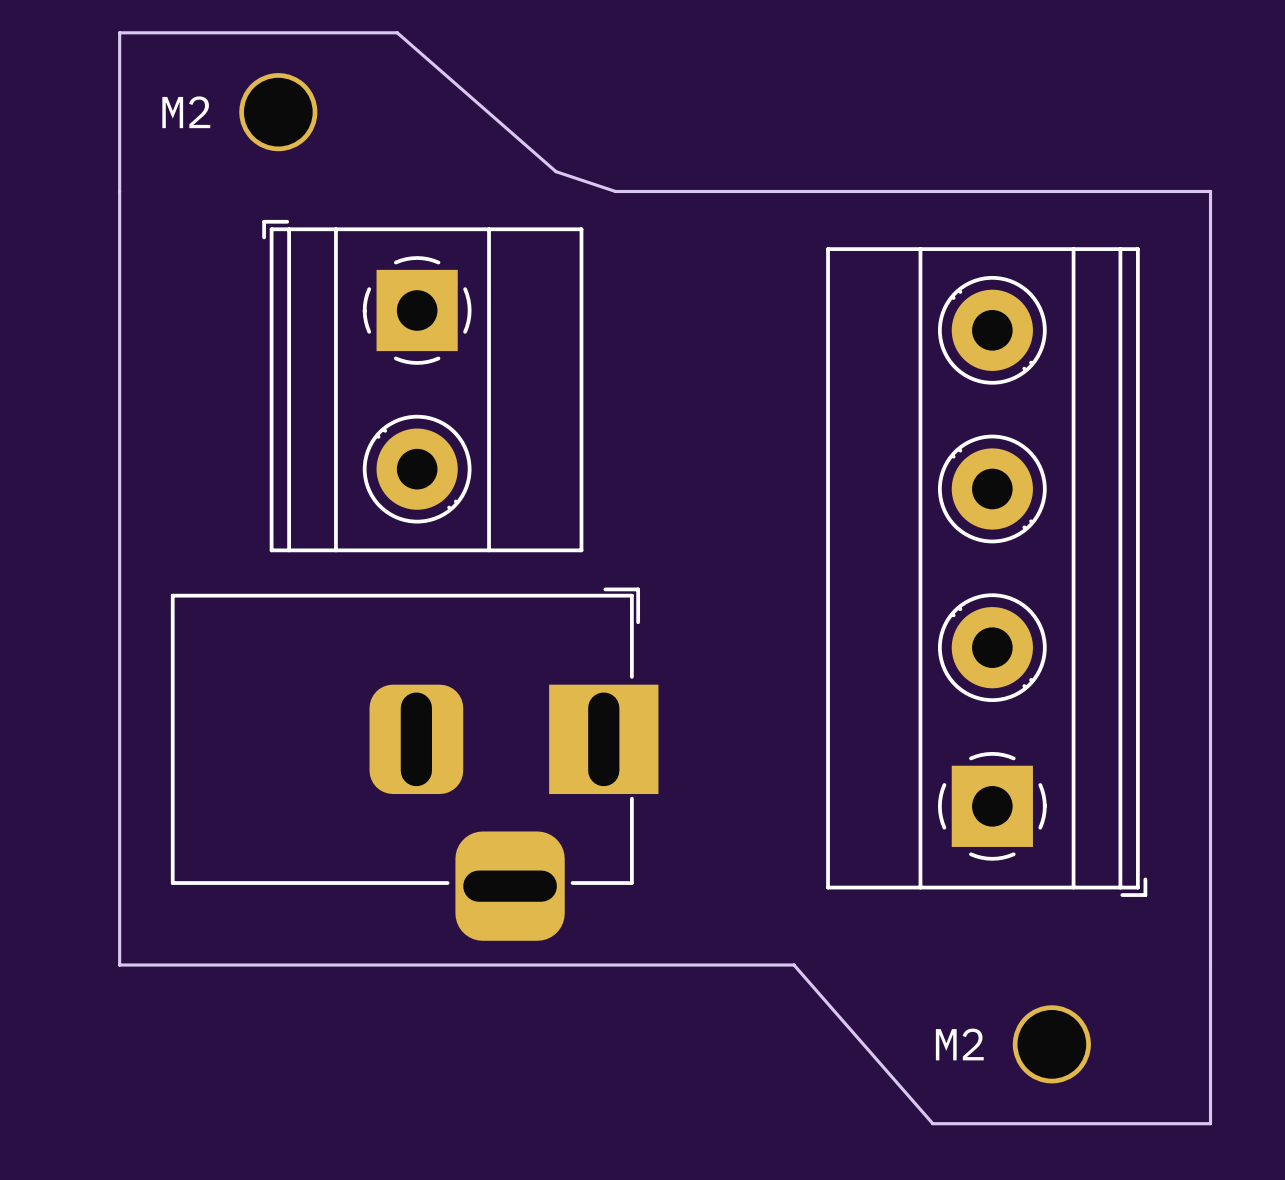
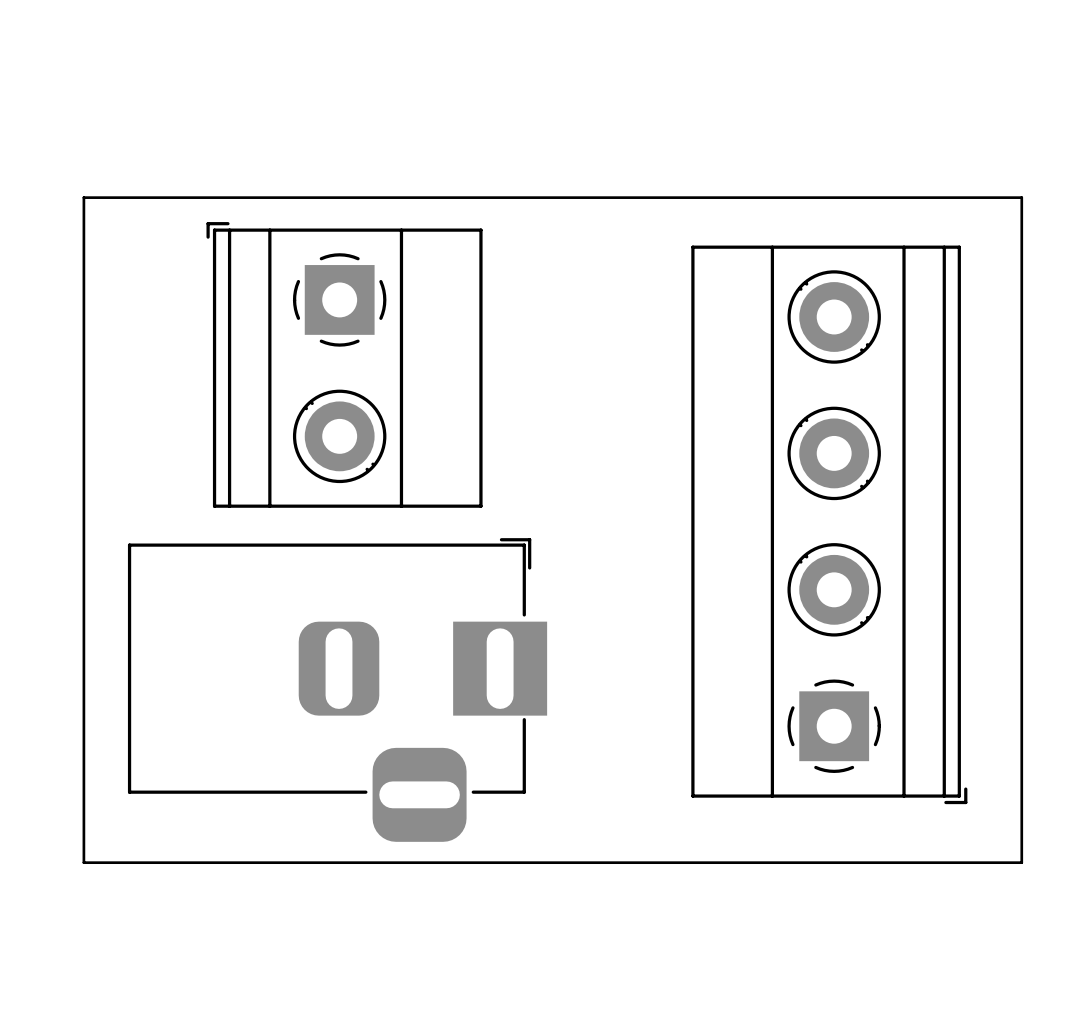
text: M2 (186, 112) -> none
part: (278, 112) -> none
board edge: (119, 191) (119, 32) (397, 32) (555, 171) (615, 191) -> (83, 197) (510, 197)
board edge: (794, 965) (932, 1123) (1210, 1123) (1210, 965) -> (663, 862) (1021, 862)
text: M2 (959, 1044) -> none
part: (1051, 1044) -> none

